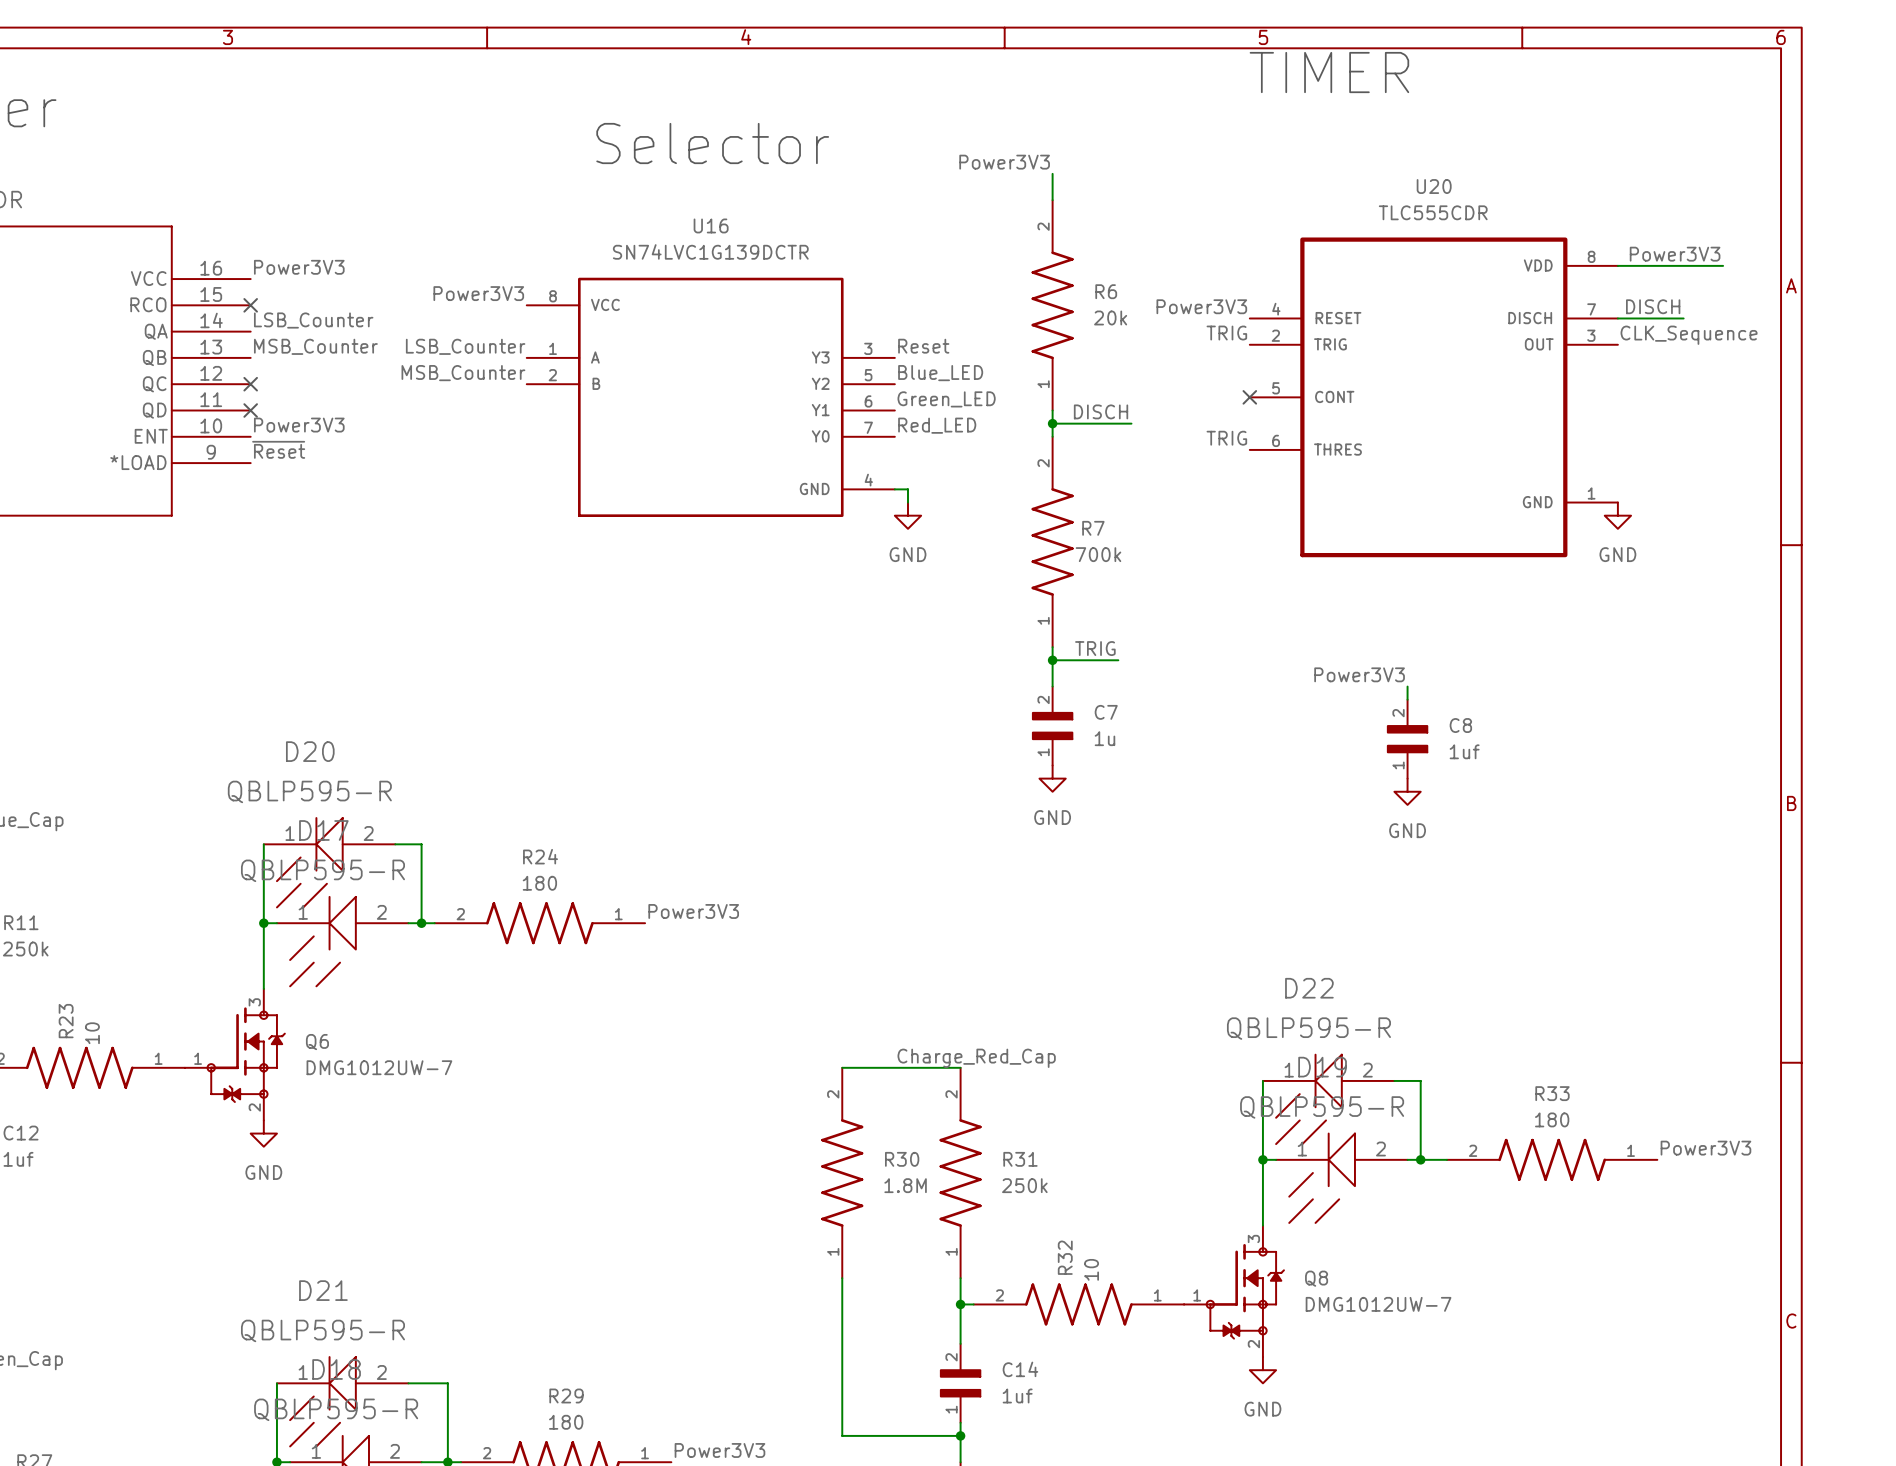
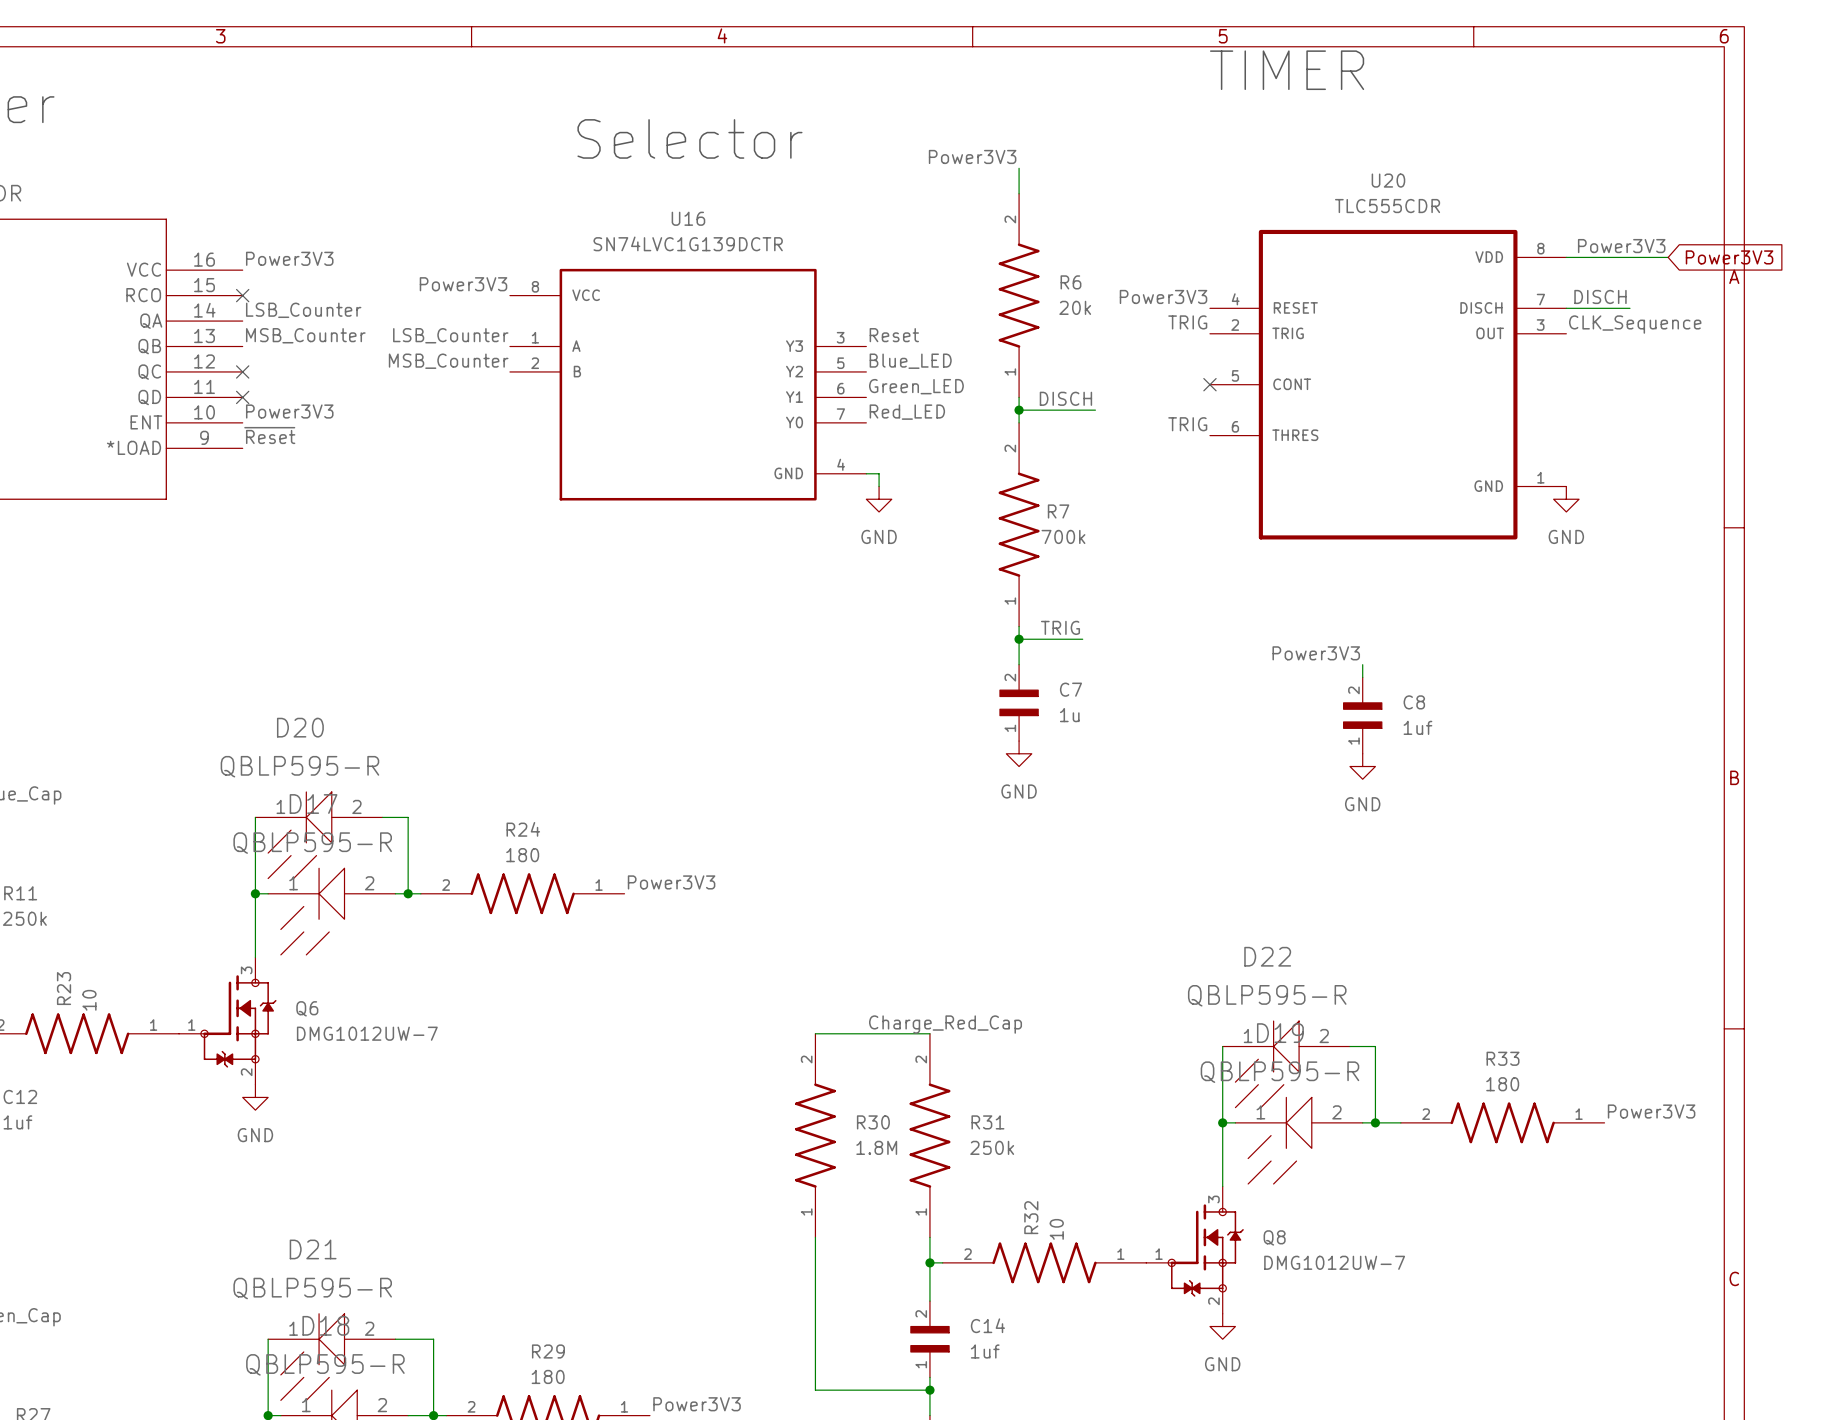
global label: none -> Power3V3 (1729, 257)

